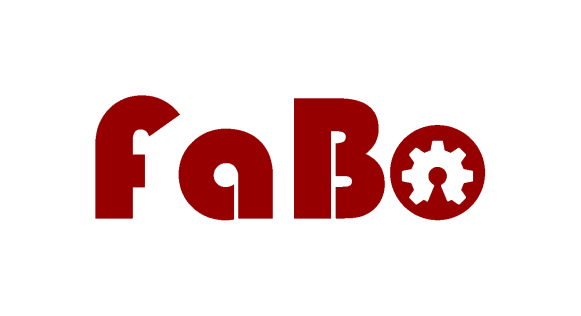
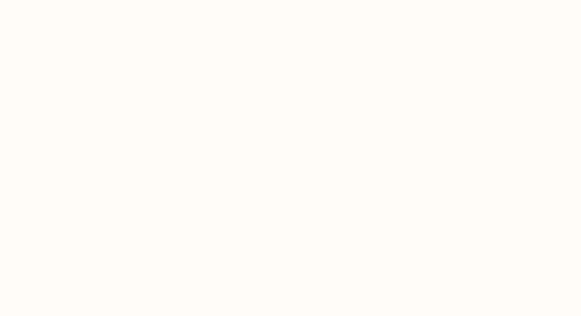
part: (290, 157) -> none

